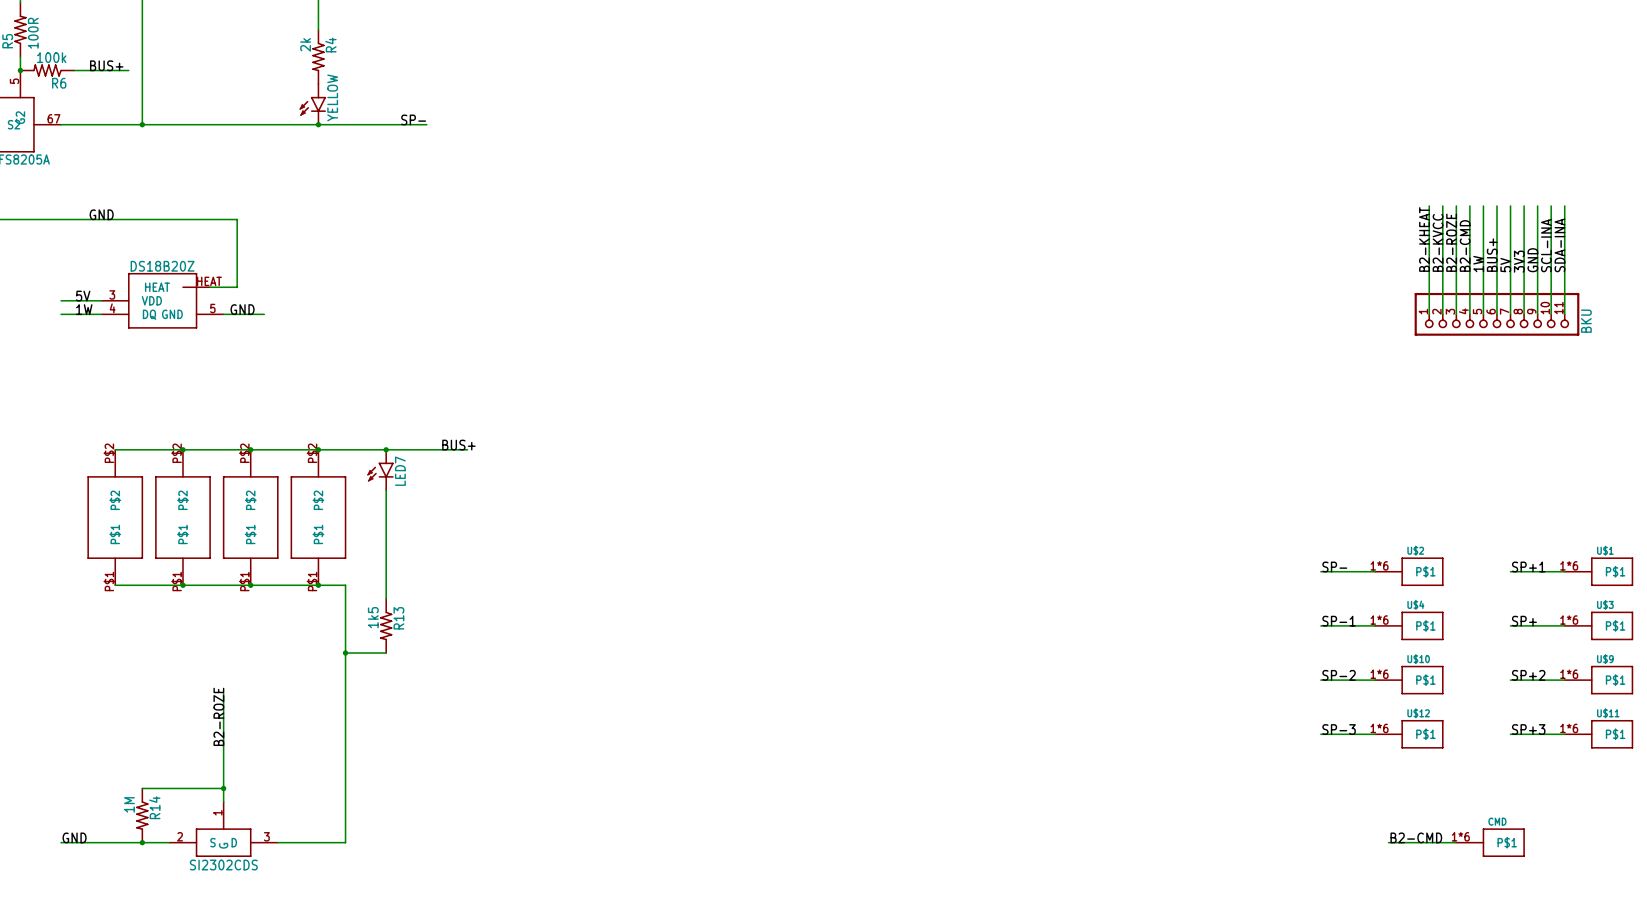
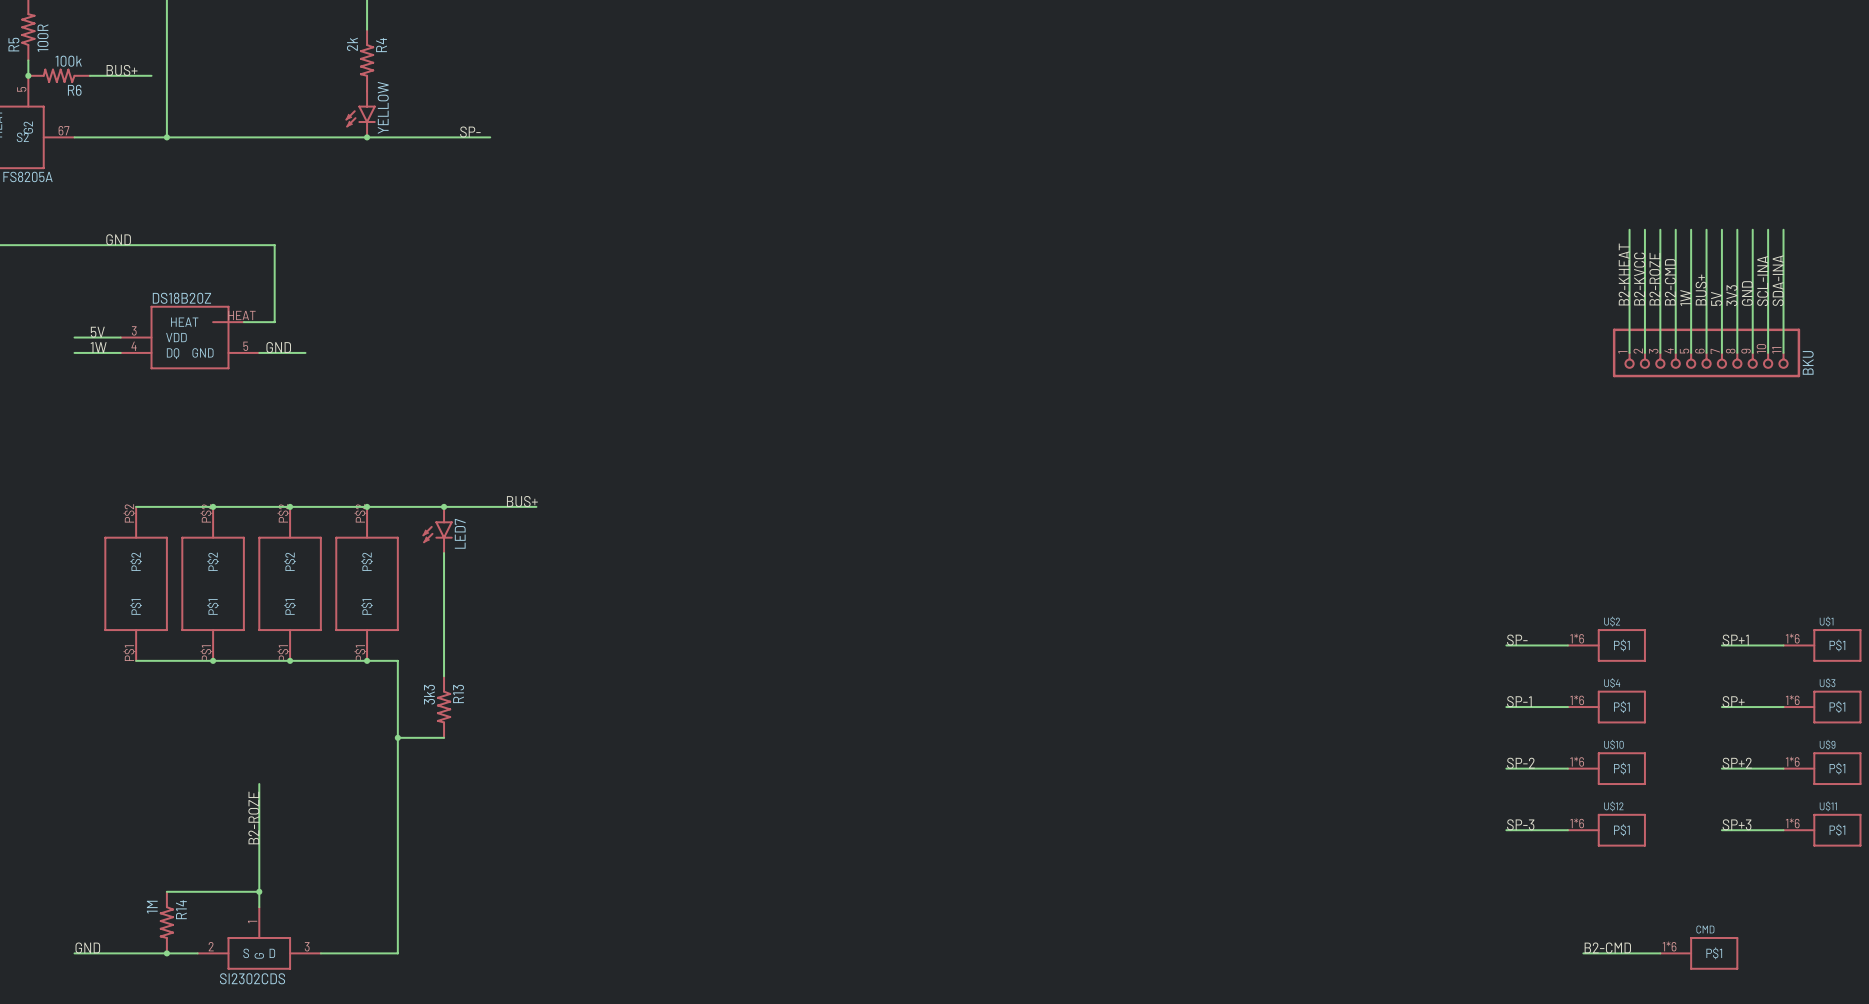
R13 value: 1k5 (373, 617) -> 3k3 (429, 694)

